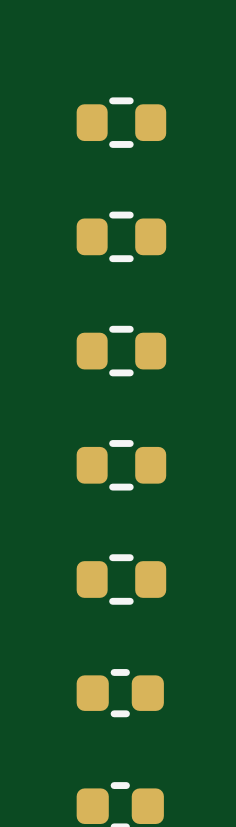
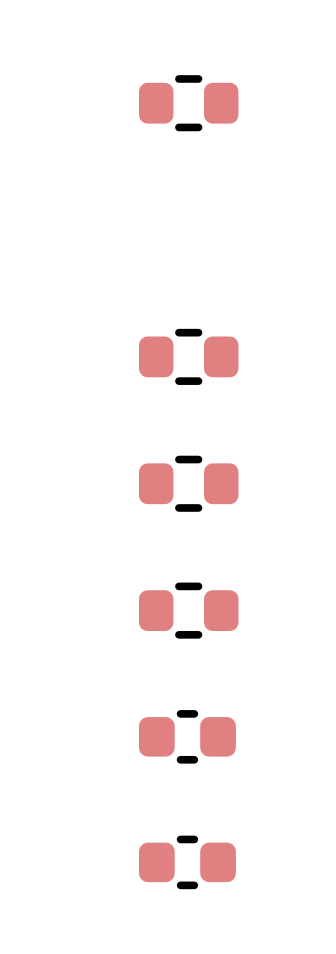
part: (121, 236) -> none

